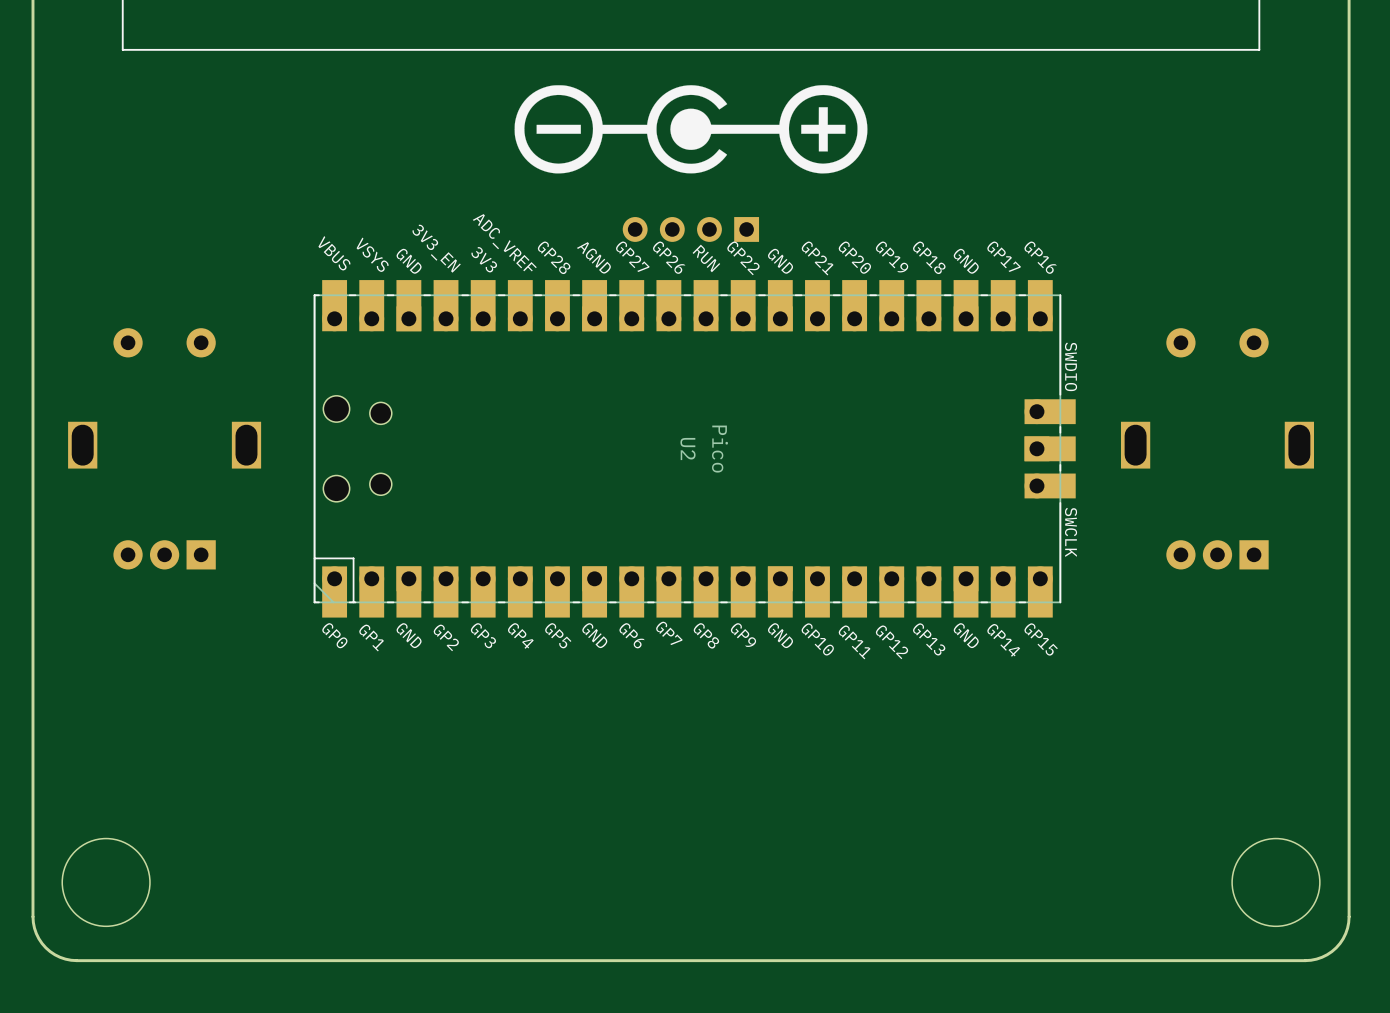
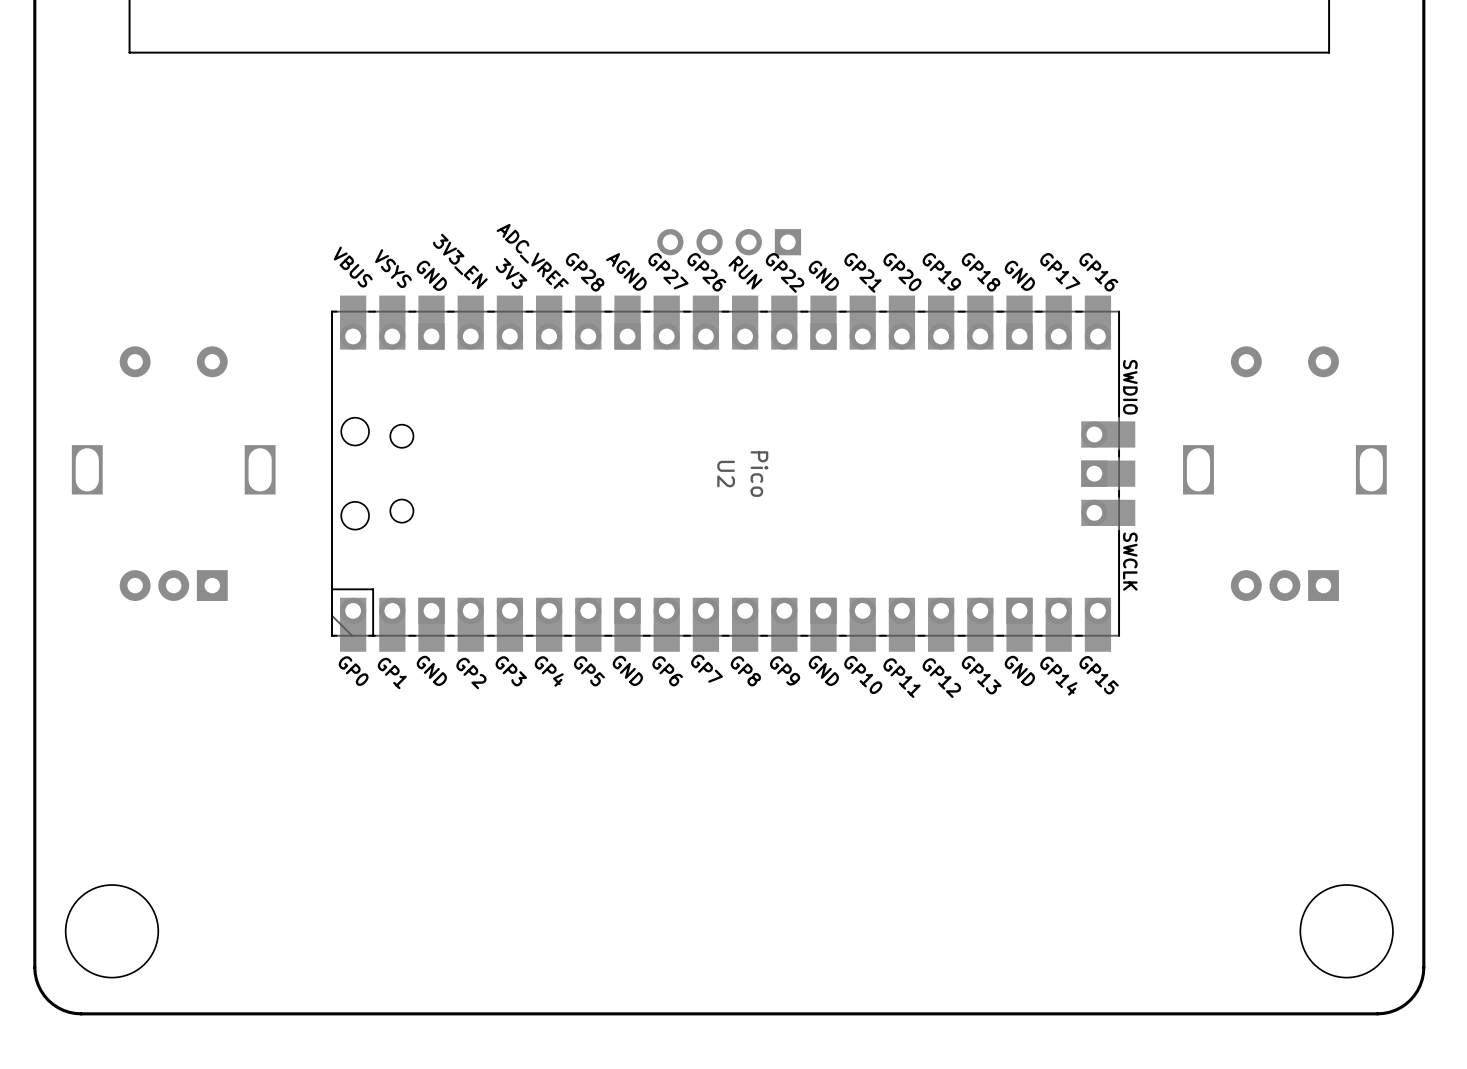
drawing: [514, 85, 868, 174] -> none

